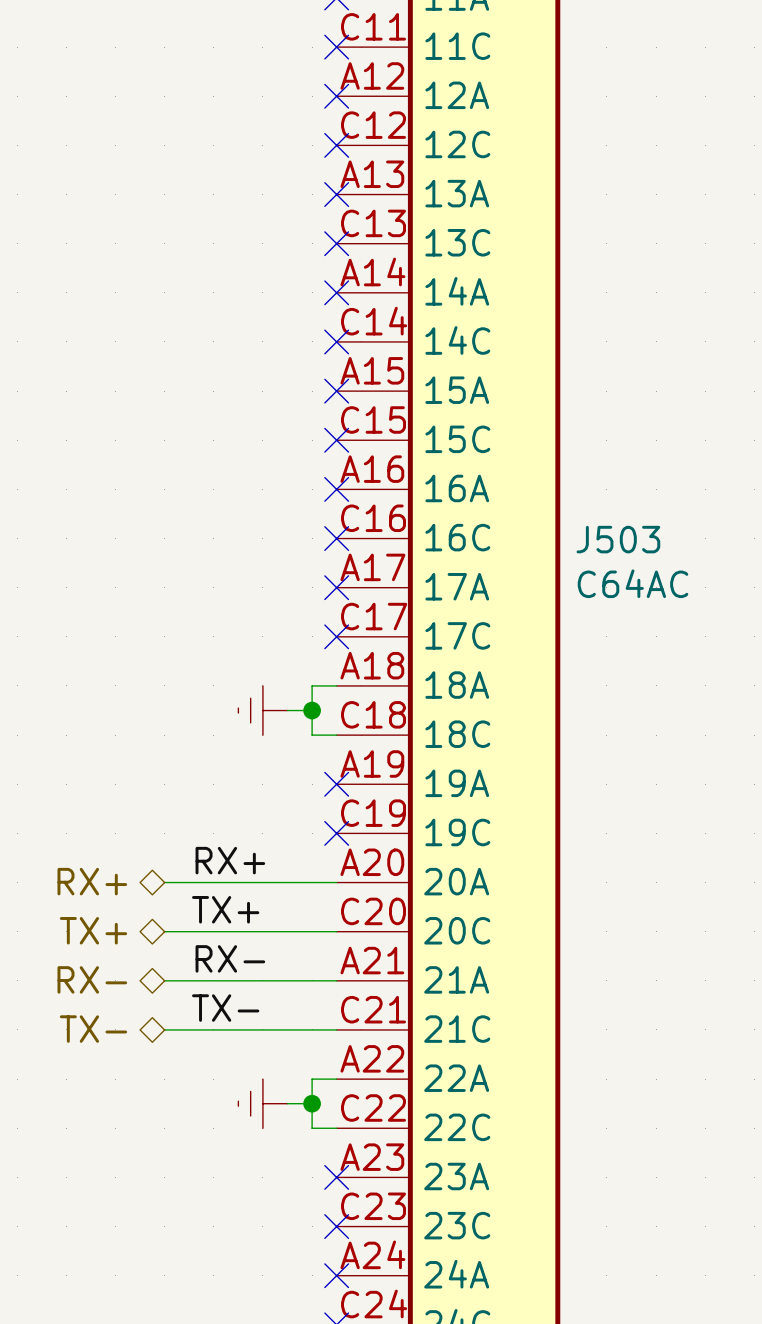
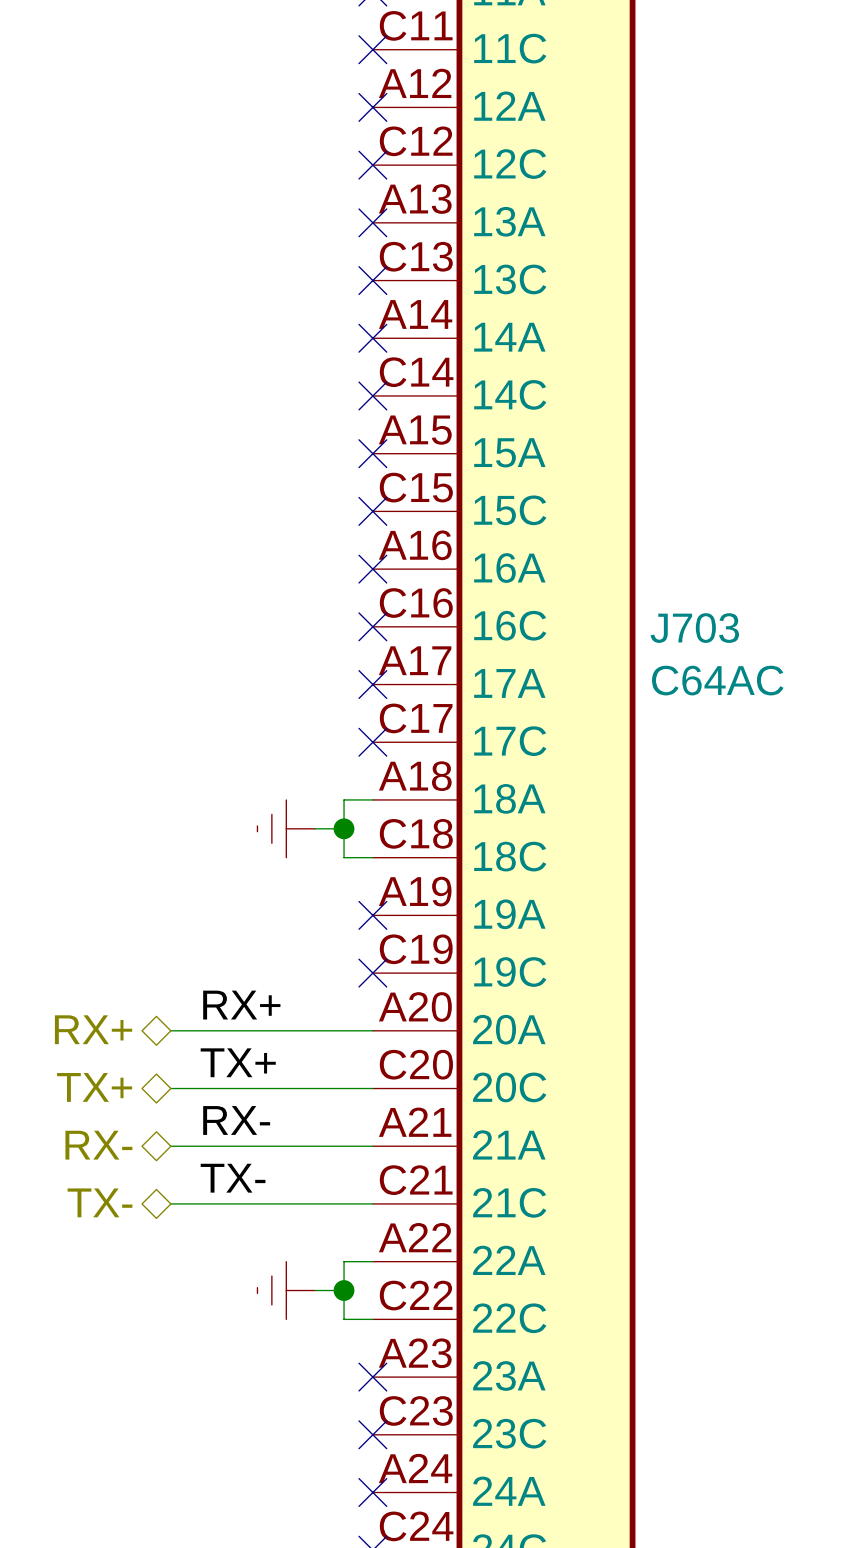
J503 name: J503 (618, 539) -> J703 (694, 628)

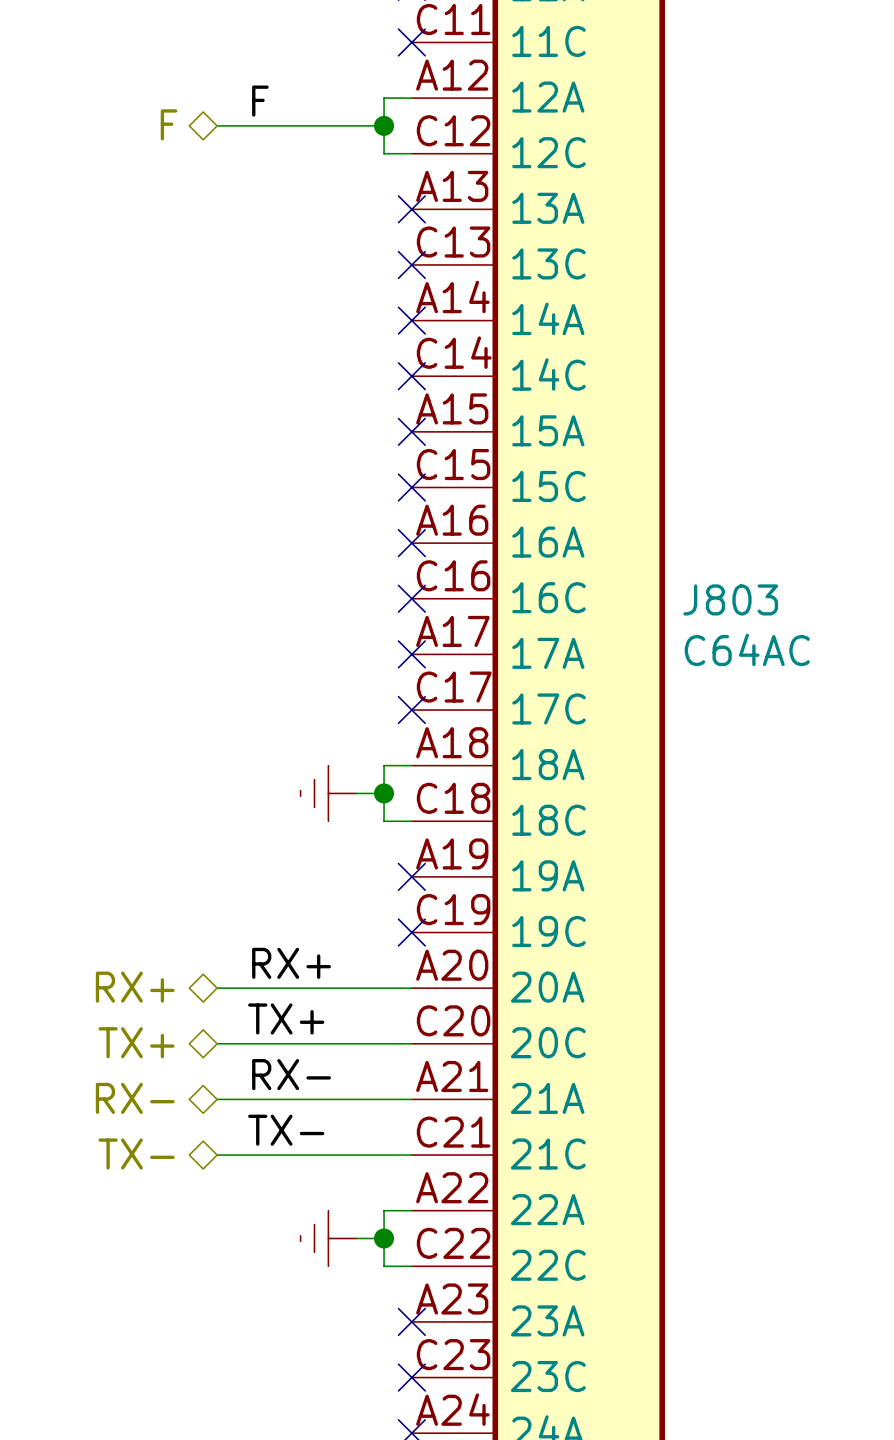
wire: none -> (411, 98) (384, 98) (384, 153) (411, 153)
no-connect mark: (372, 107) -> none
label: none -> F (260, 101)
hierarchical label: none -> F (169, 124)
wire: none -> (217, 125) (384, 125)
junction: none -> (384, 125)
no-connect mark: (372, 165) -> none
J703 name: J703 (694, 628) -> J803 (730, 599)

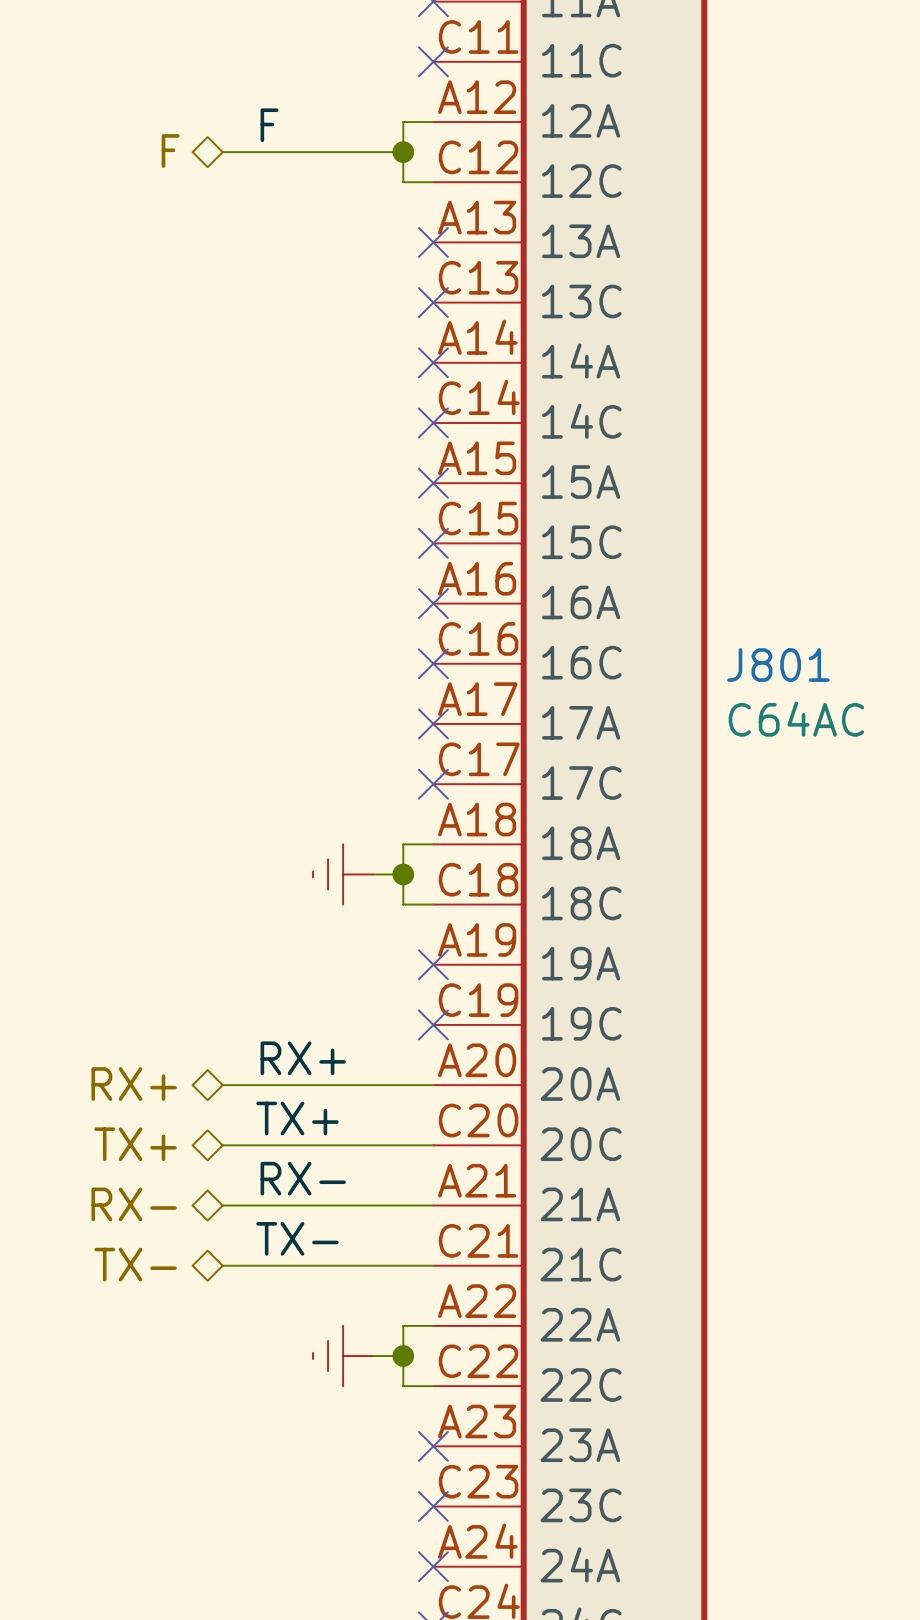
J803 name: J803 (730, 599) -> J801 (778, 665)

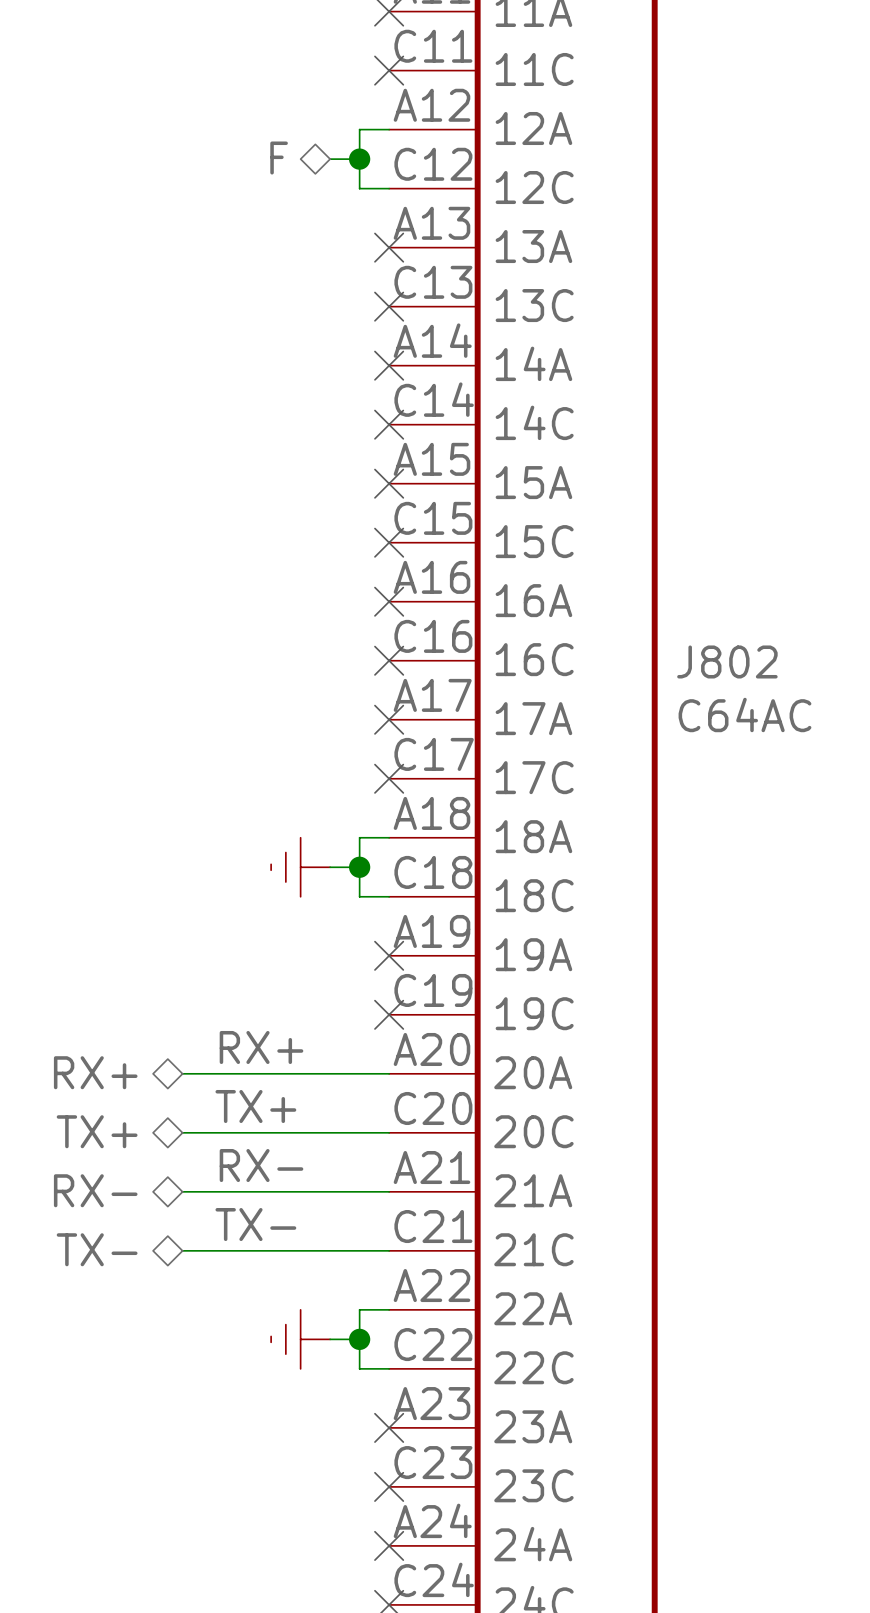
label: F (269, 125) -> none
hierarchical label position: F (170, 150) -> F (279, 158)
wire: (222, 152) (373, 152) -> none
J801 name: J801 (778, 665) -> J802 (727, 661)

